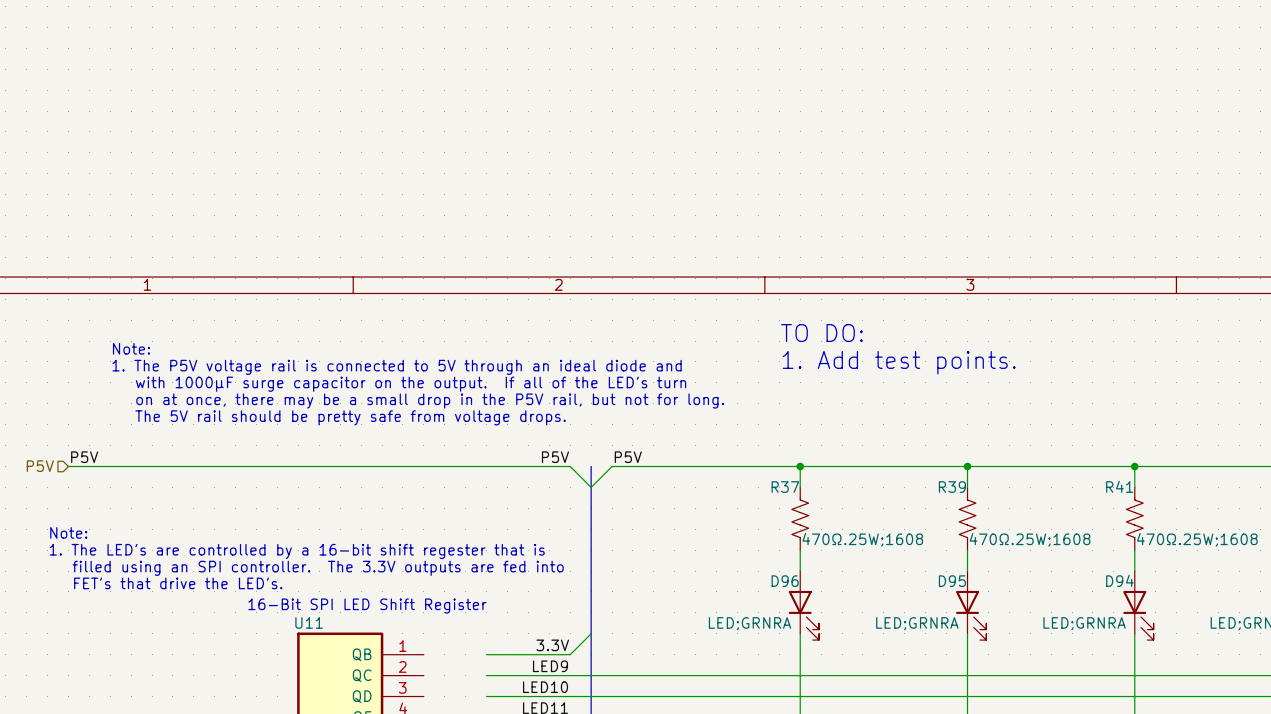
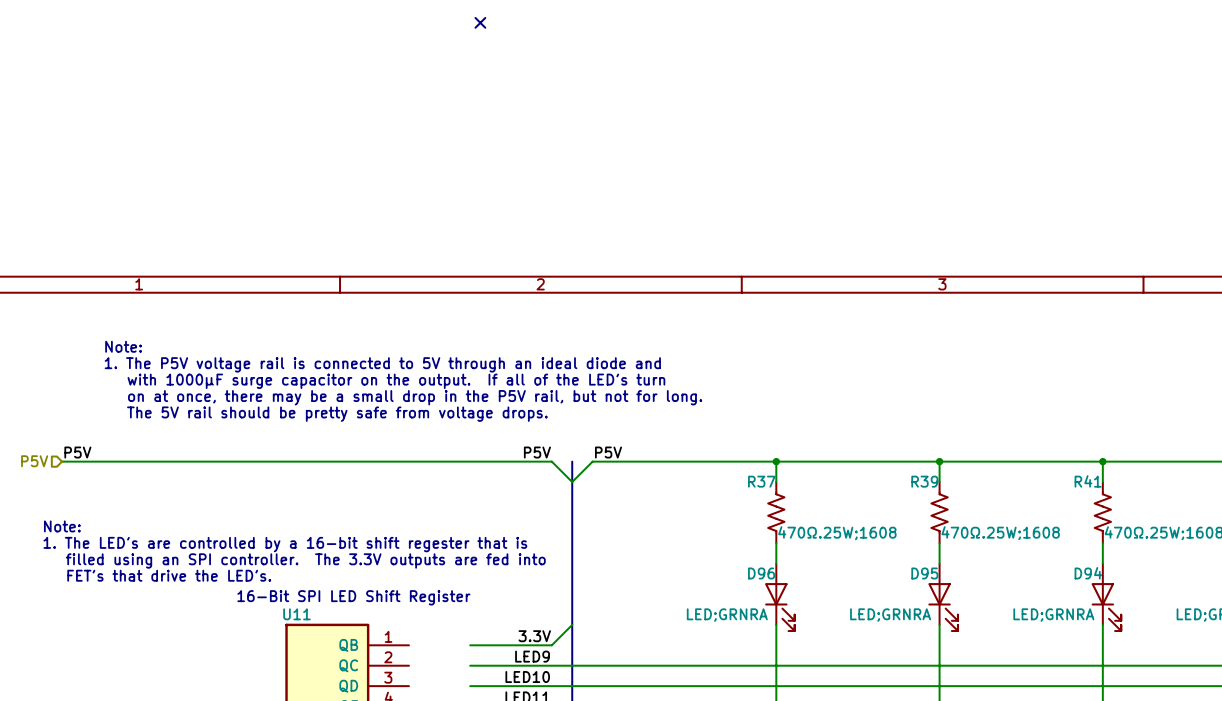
no-connect mark: none -> (480, 22)
text: TO DO: (821, 333) -> none
text: 1. Add test points. (899, 362) -> none

